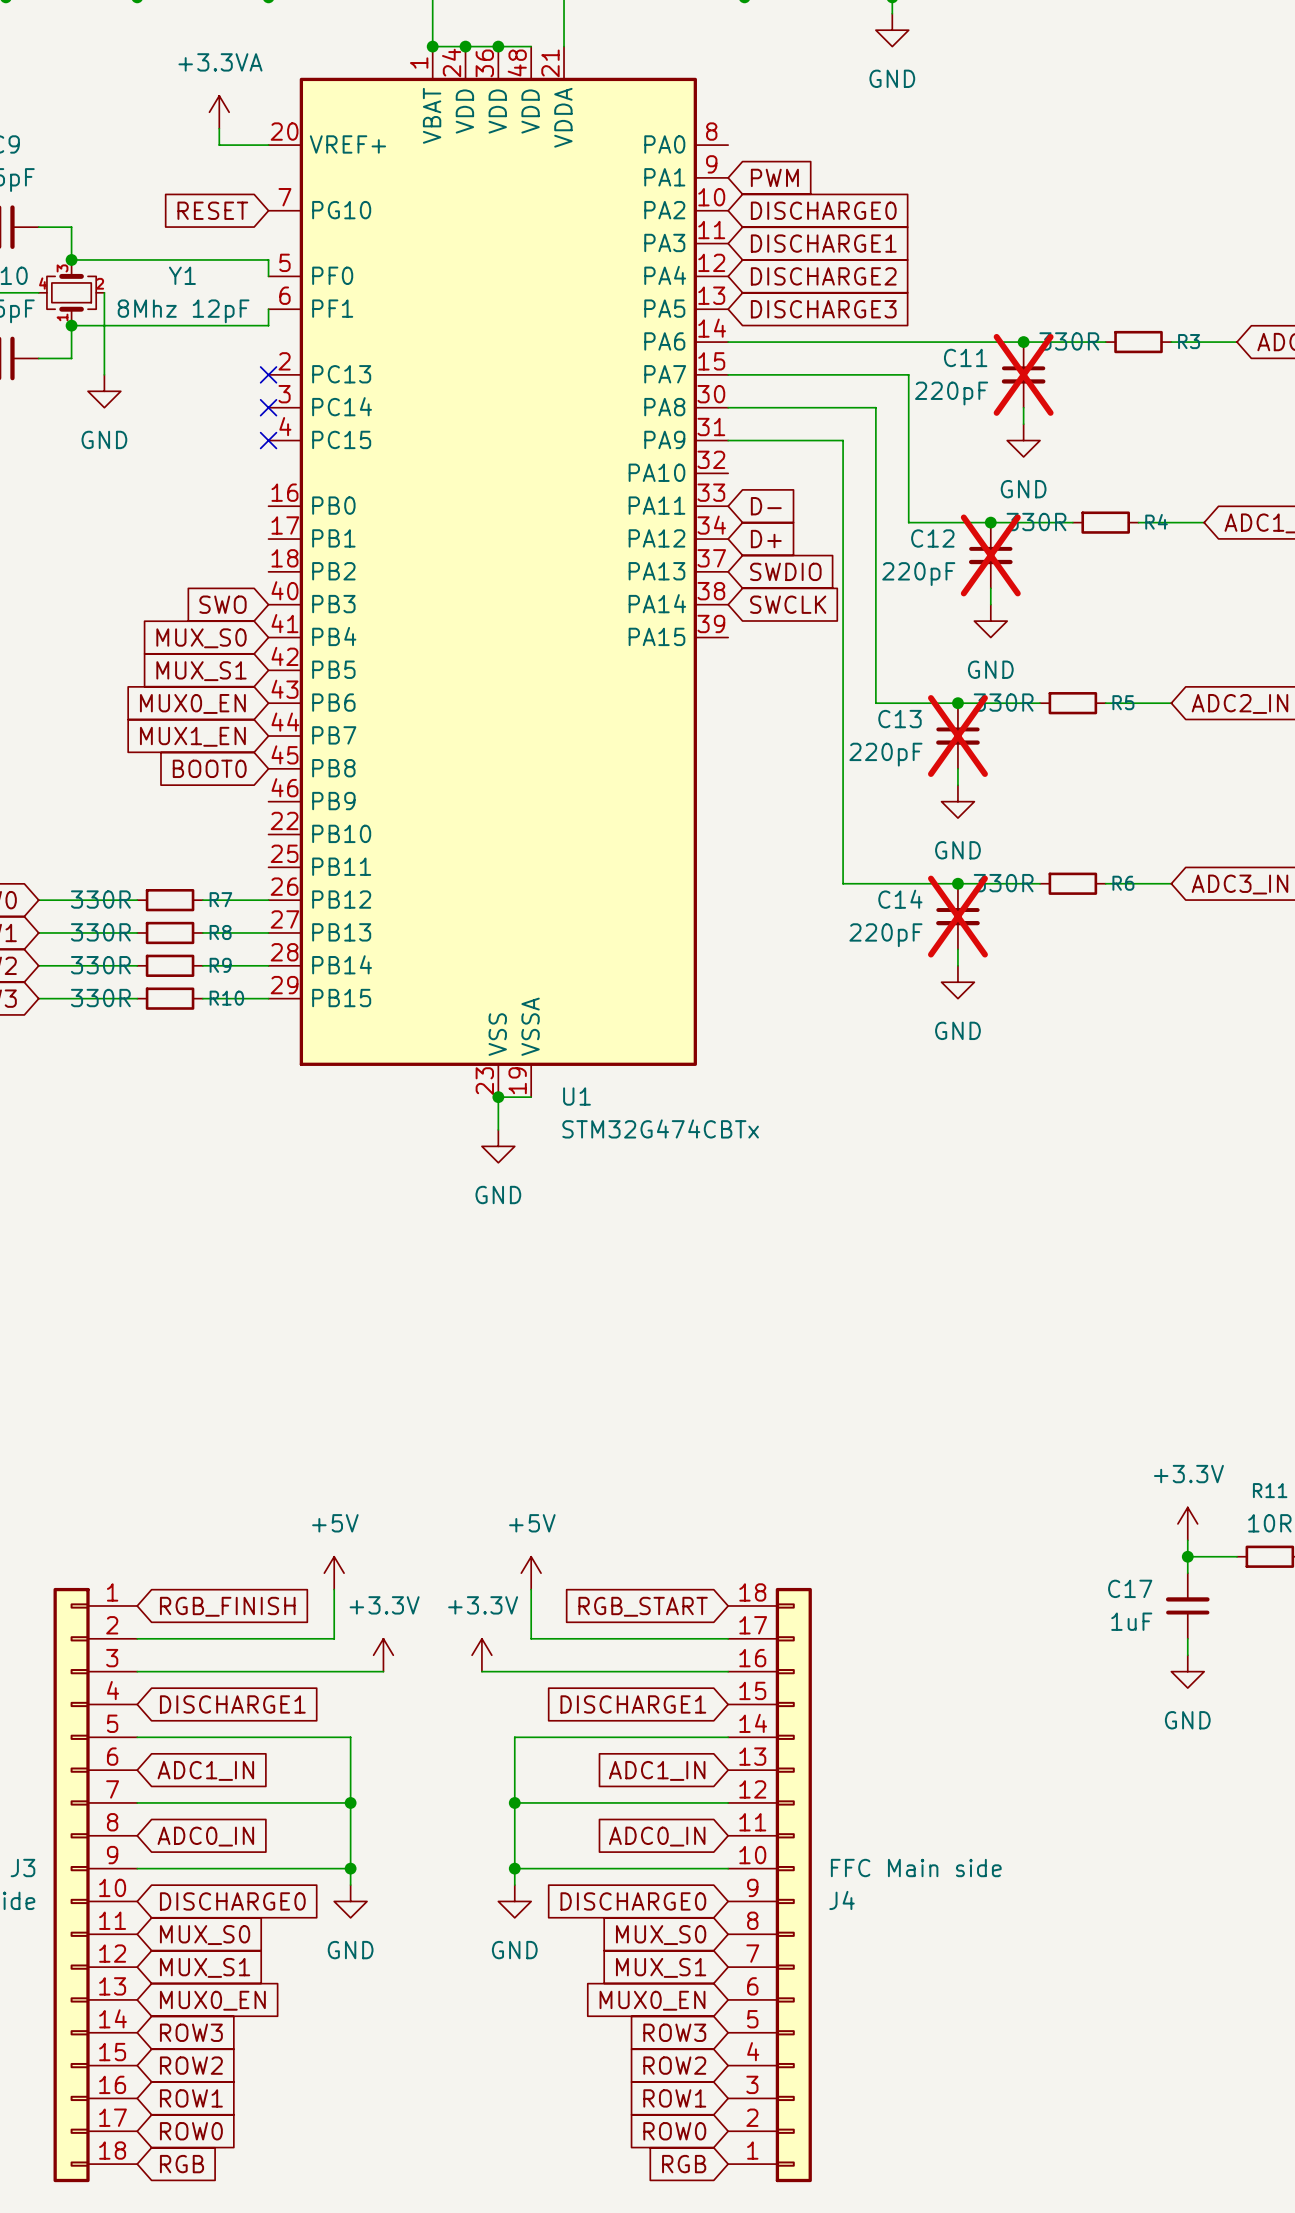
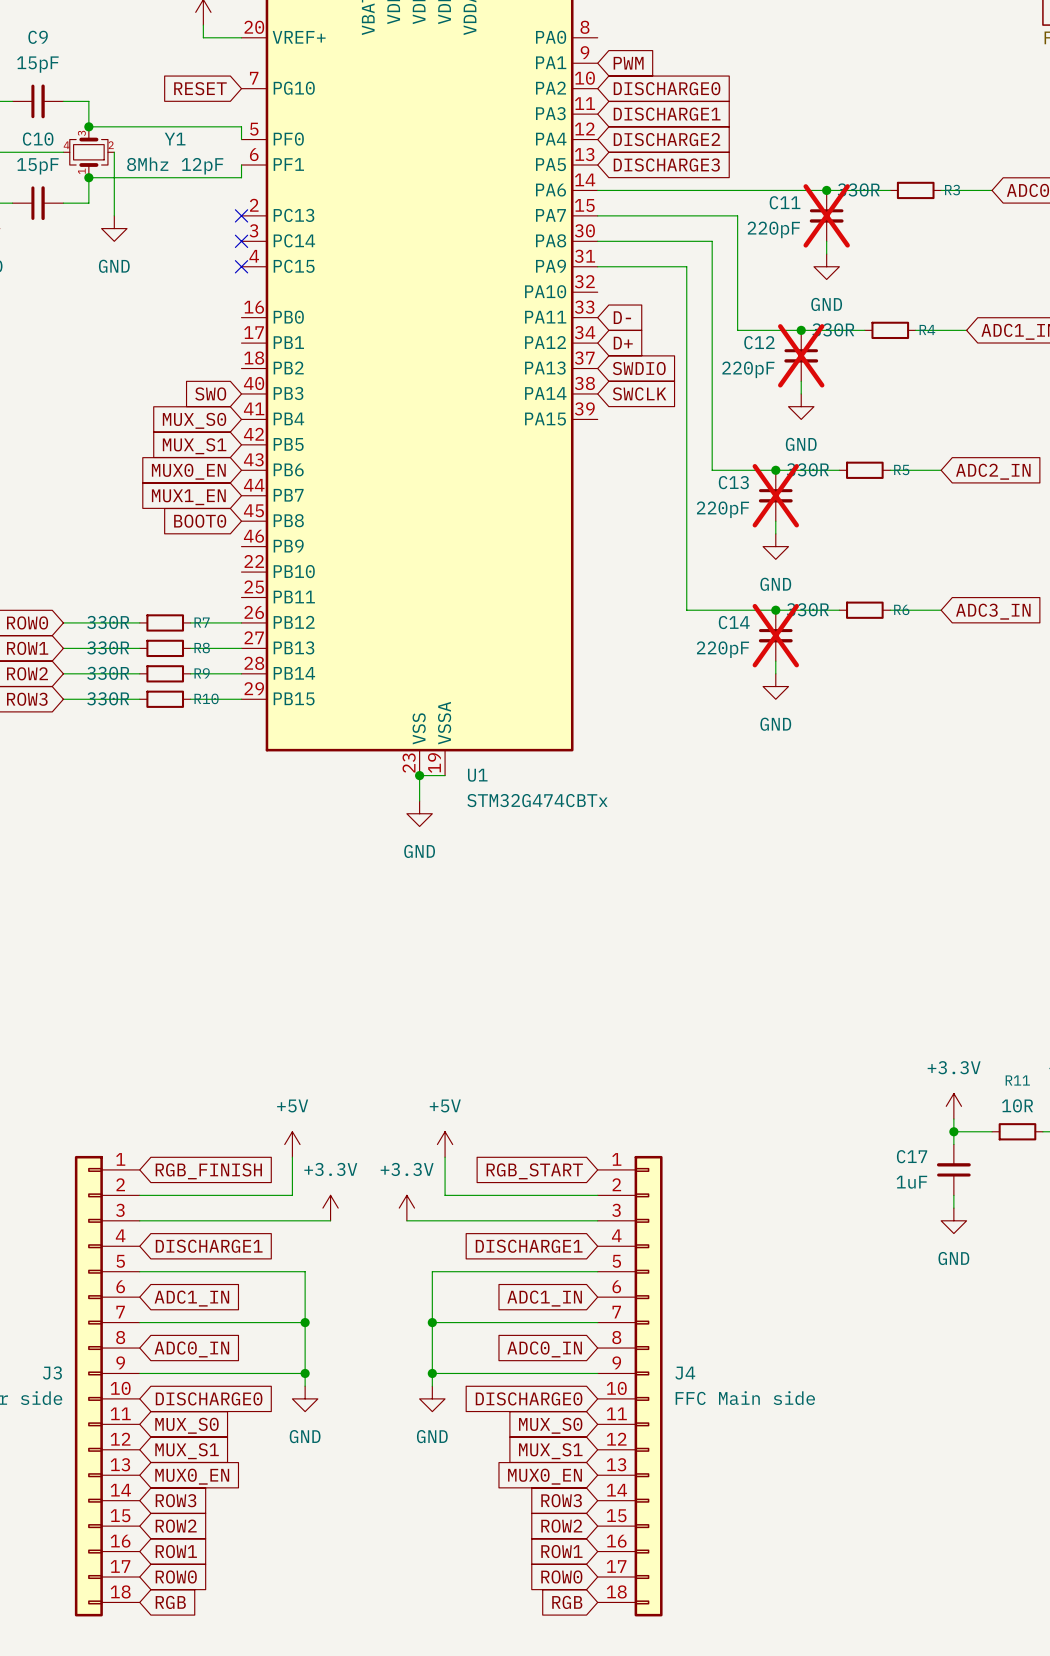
J4 flip: as is (793, 1885) -> up-down (648, 1386)

